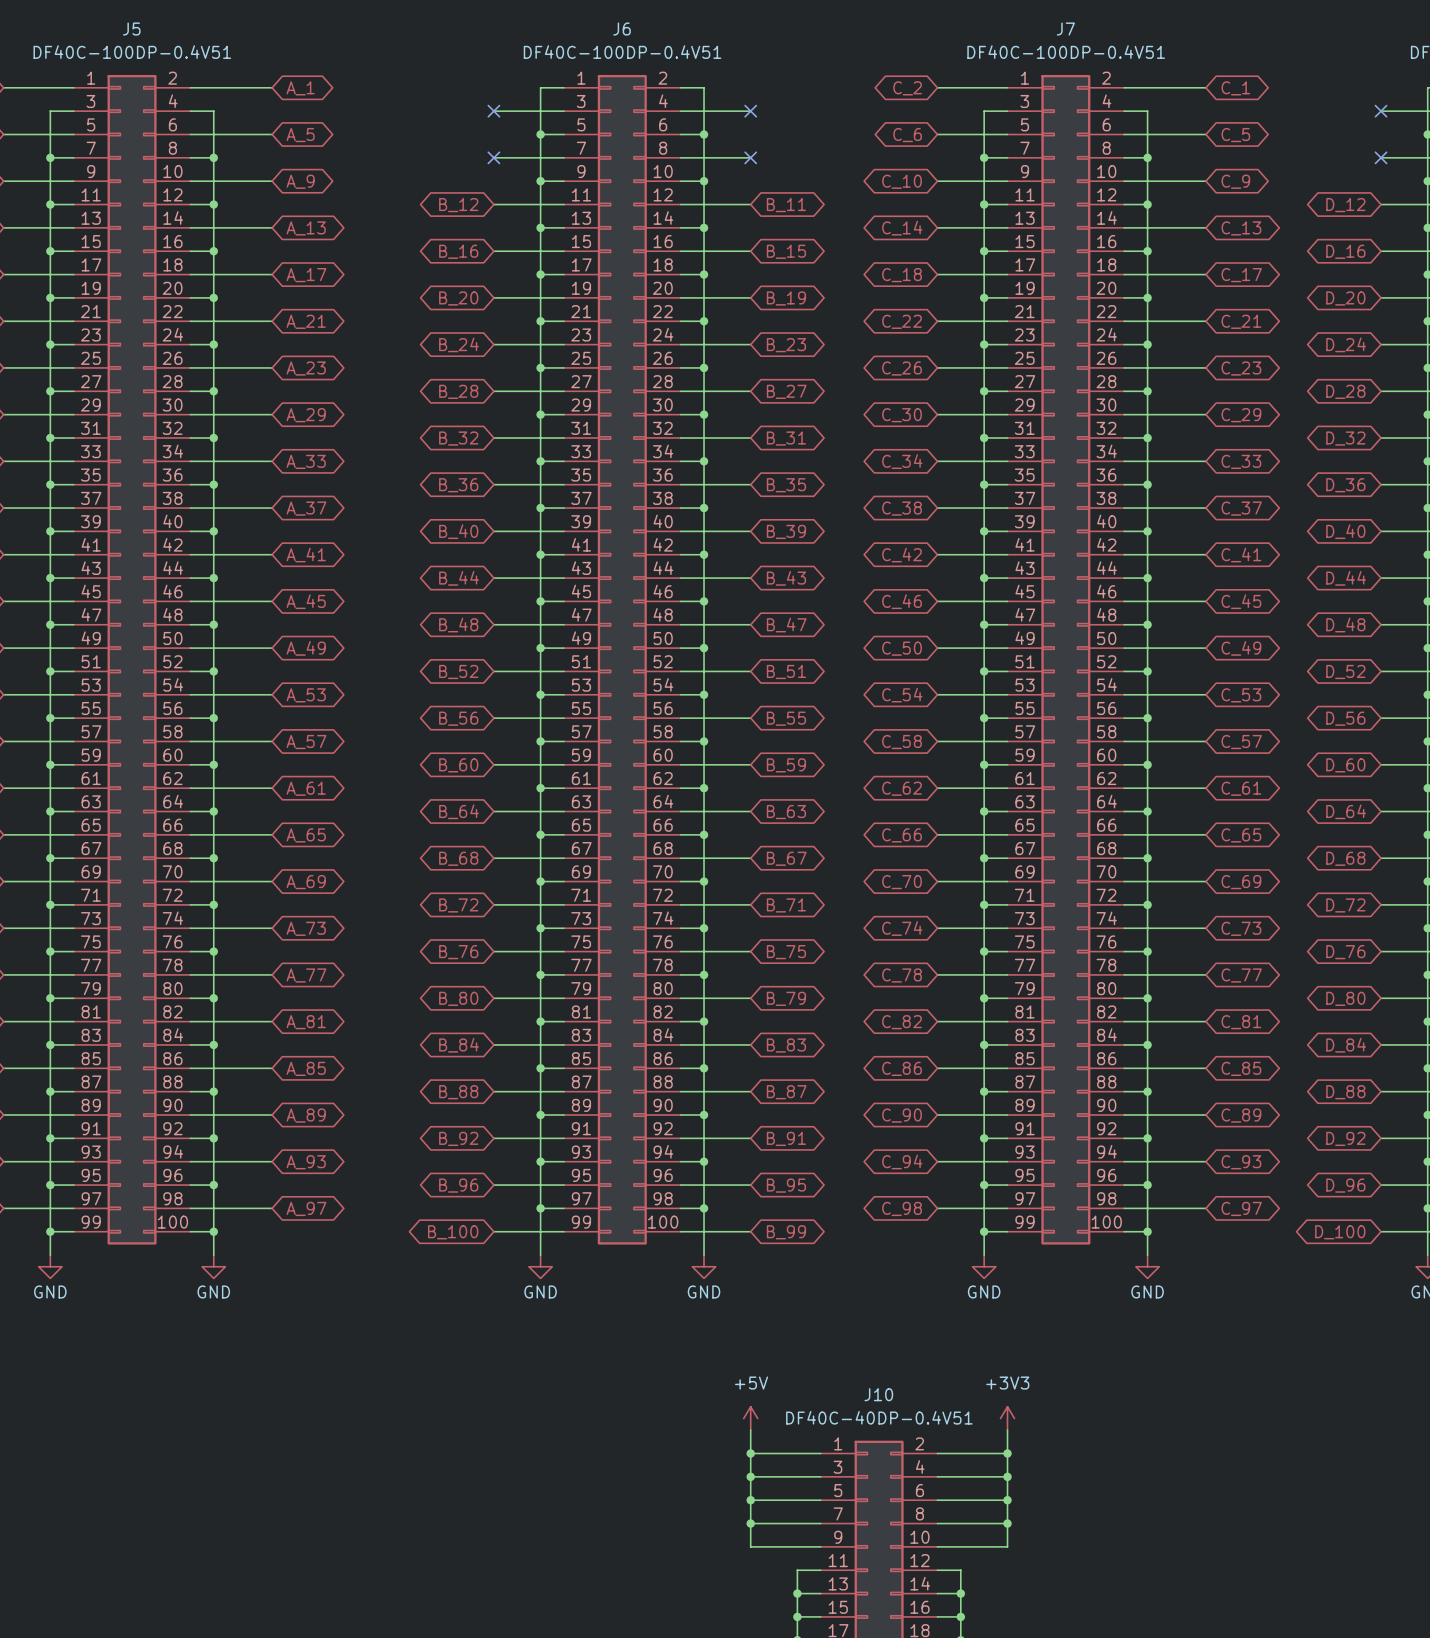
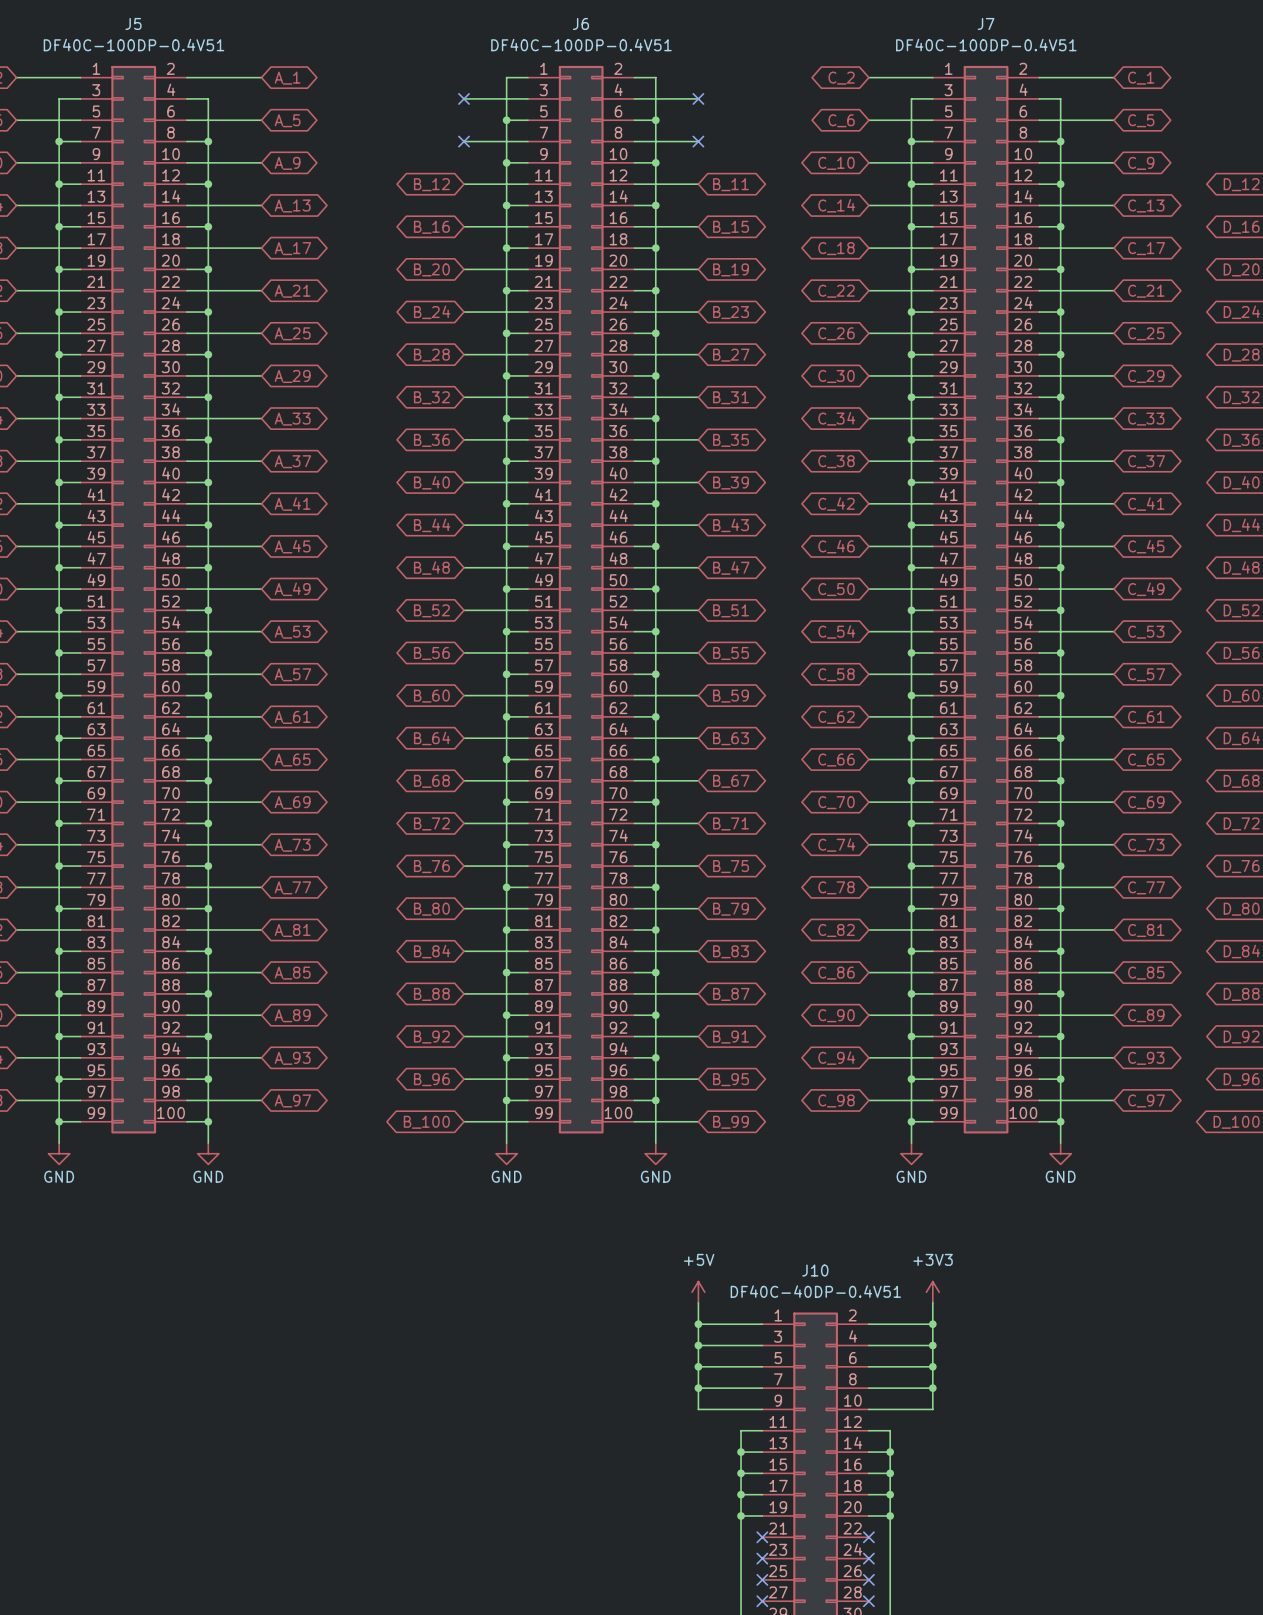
global label: A_23 (306, 368) -> A_25 (292, 333)
global label: C_23 (1241, 368) -> C_25 (1146, 333)

